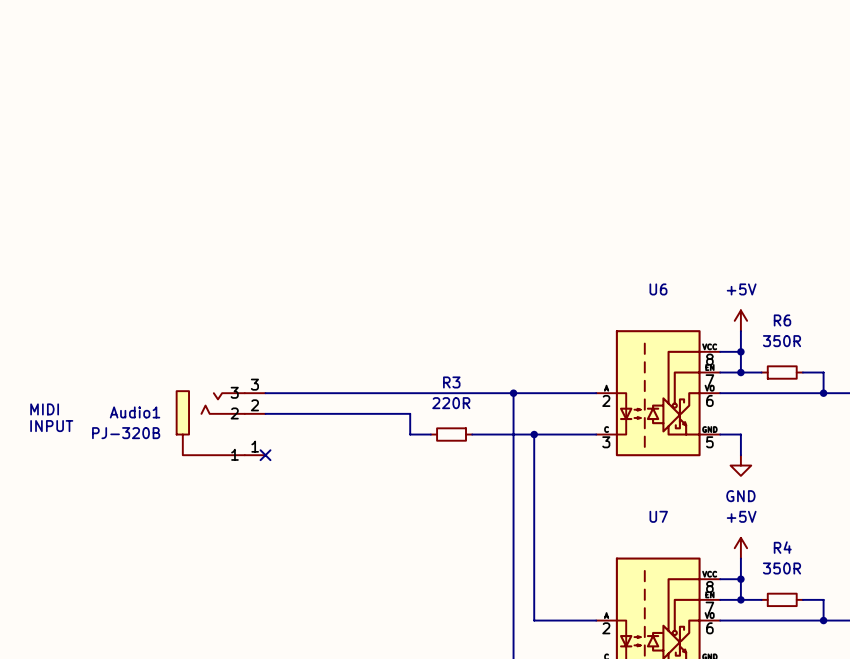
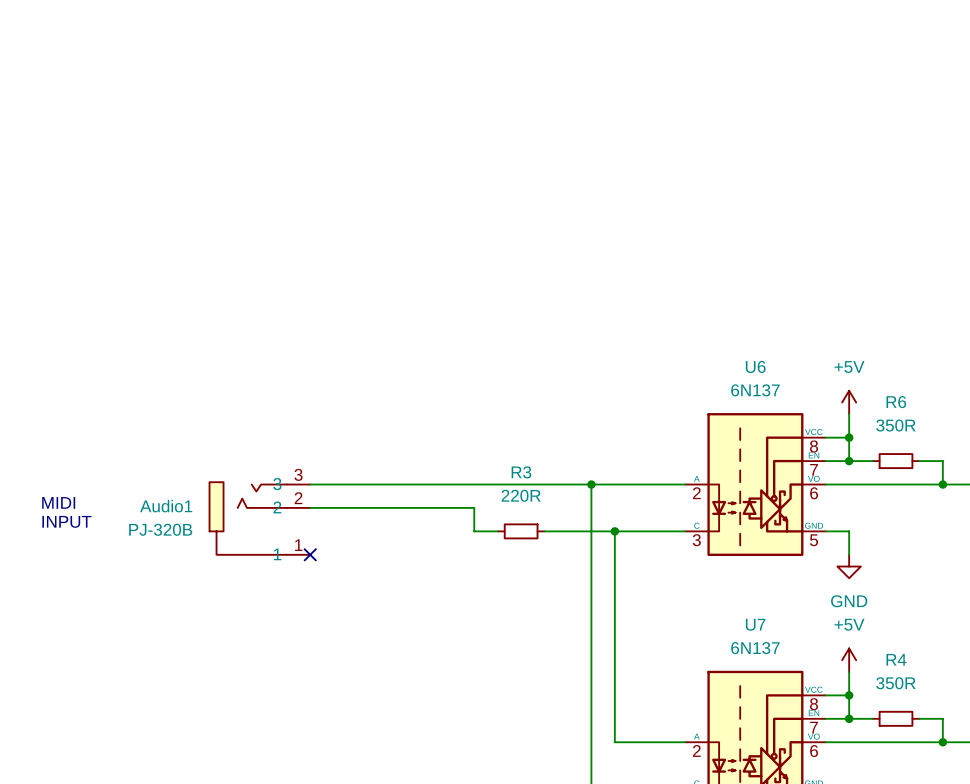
U6 value: none -> 6N137 (755, 390)
U7 value: none -> 6N137 (755, 648)

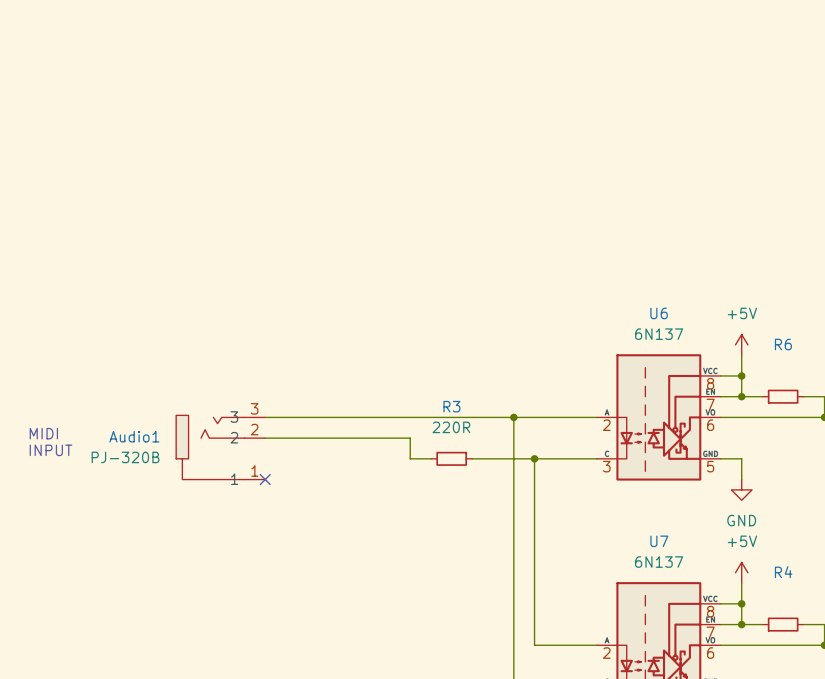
R6 value: 350R (895, 425) -> none
R4 value: 350R (895, 683) -> none

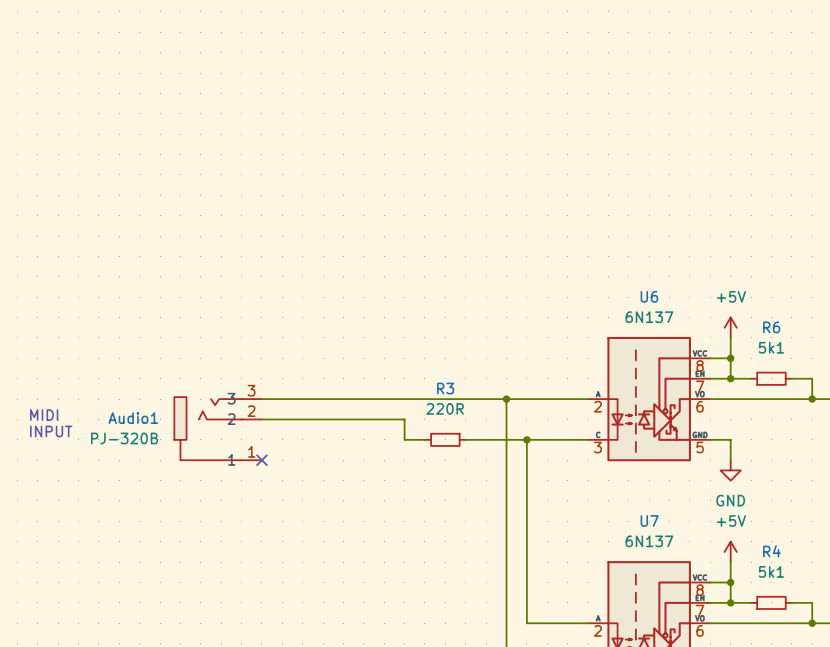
R6 value: none -> 5k1 (771, 347)
R4 value: none -> 5k1 (771, 571)

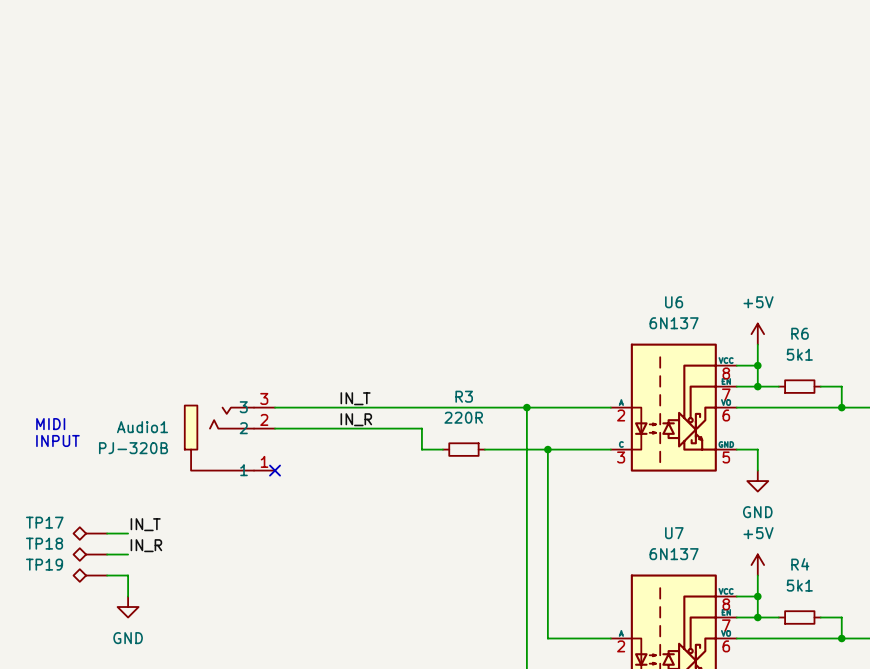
label: none -> IN_T (355, 398)
label: none -> IN_R (356, 419)
label: none -> IN_T (145, 524)
TP17: none -> (90, 533)
wire: none -> (107, 533) (128, 533)
label: none -> IN_R (146, 545)
TP18: none -> (90, 554)
wire: none -> (107, 554) (128, 554)
TP19: none -> (90, 575)
wire: none -> (107, 575) (128, 575) (128, 596)
power symbol: none -> GND (128, 607)

